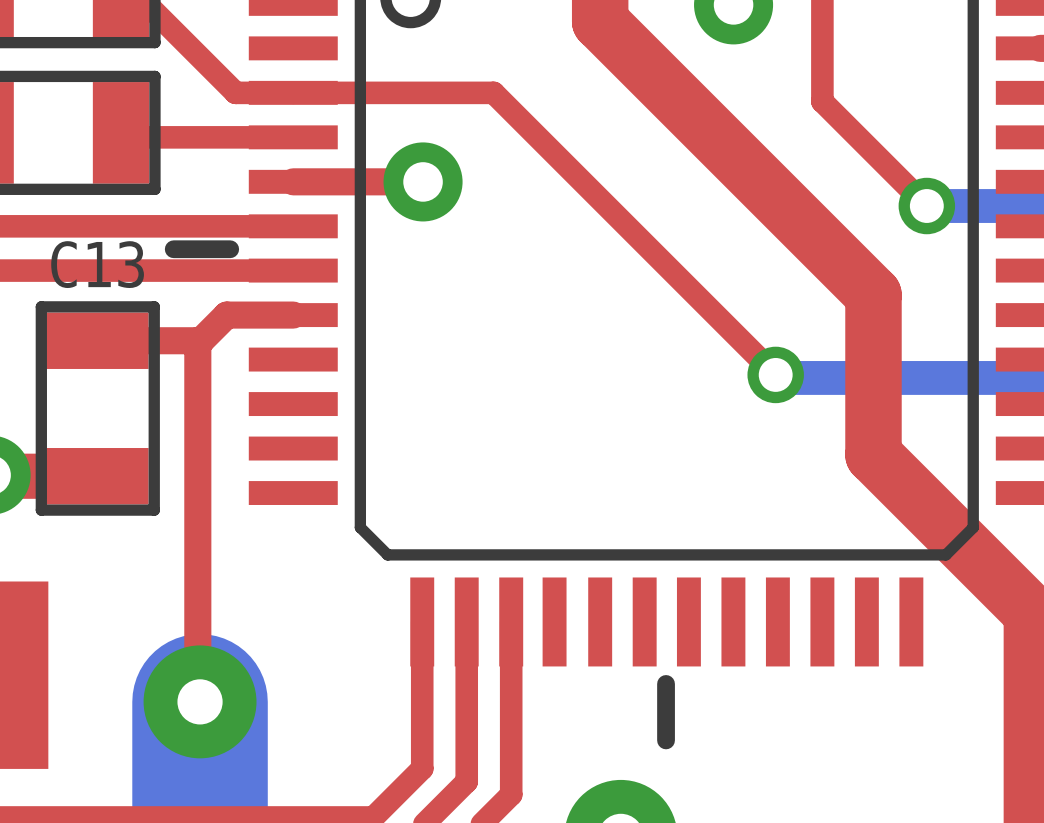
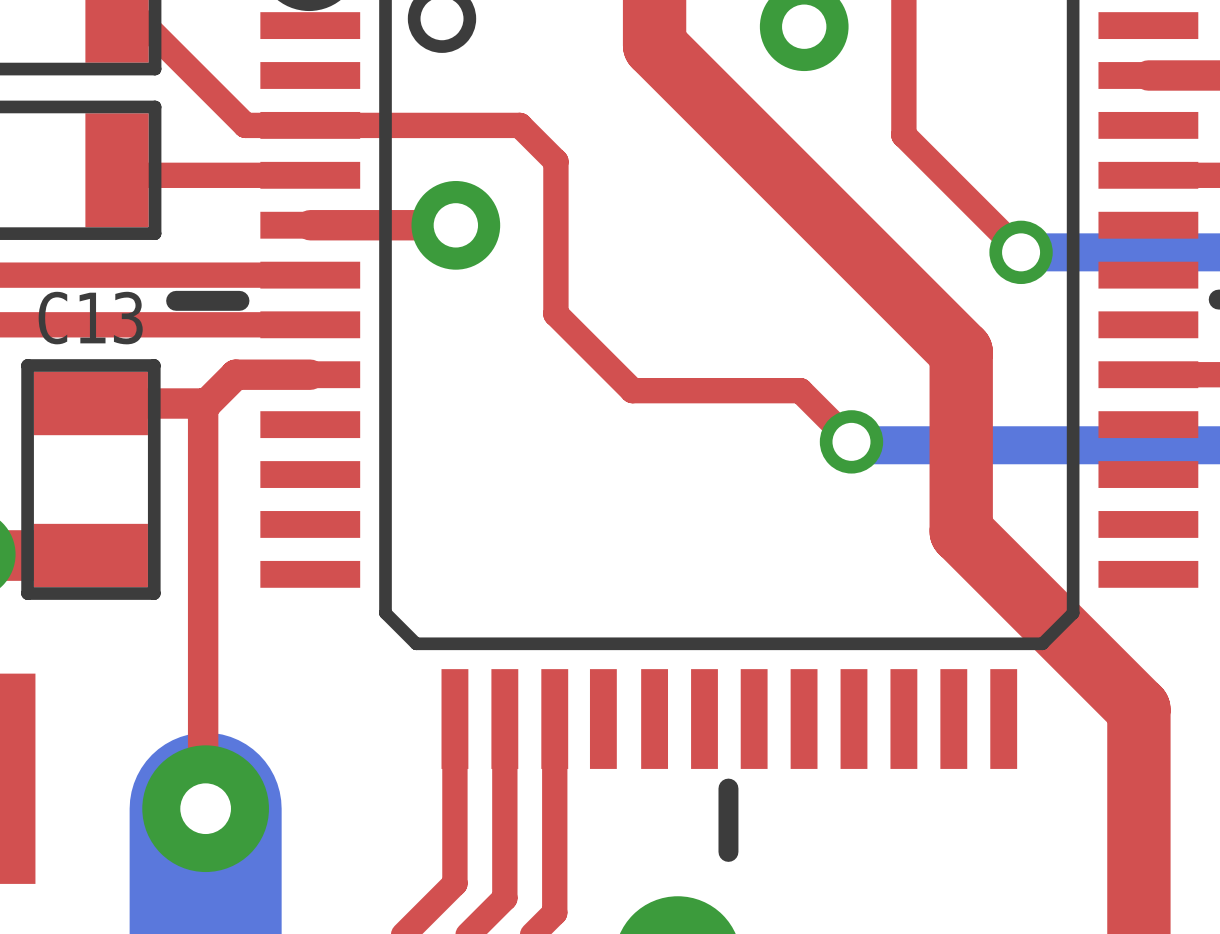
top track: (480, 92) (493, 92) (730, 329) -> (519, 125) (555, 161) (555, 314) (632, 390) (800, 390)

